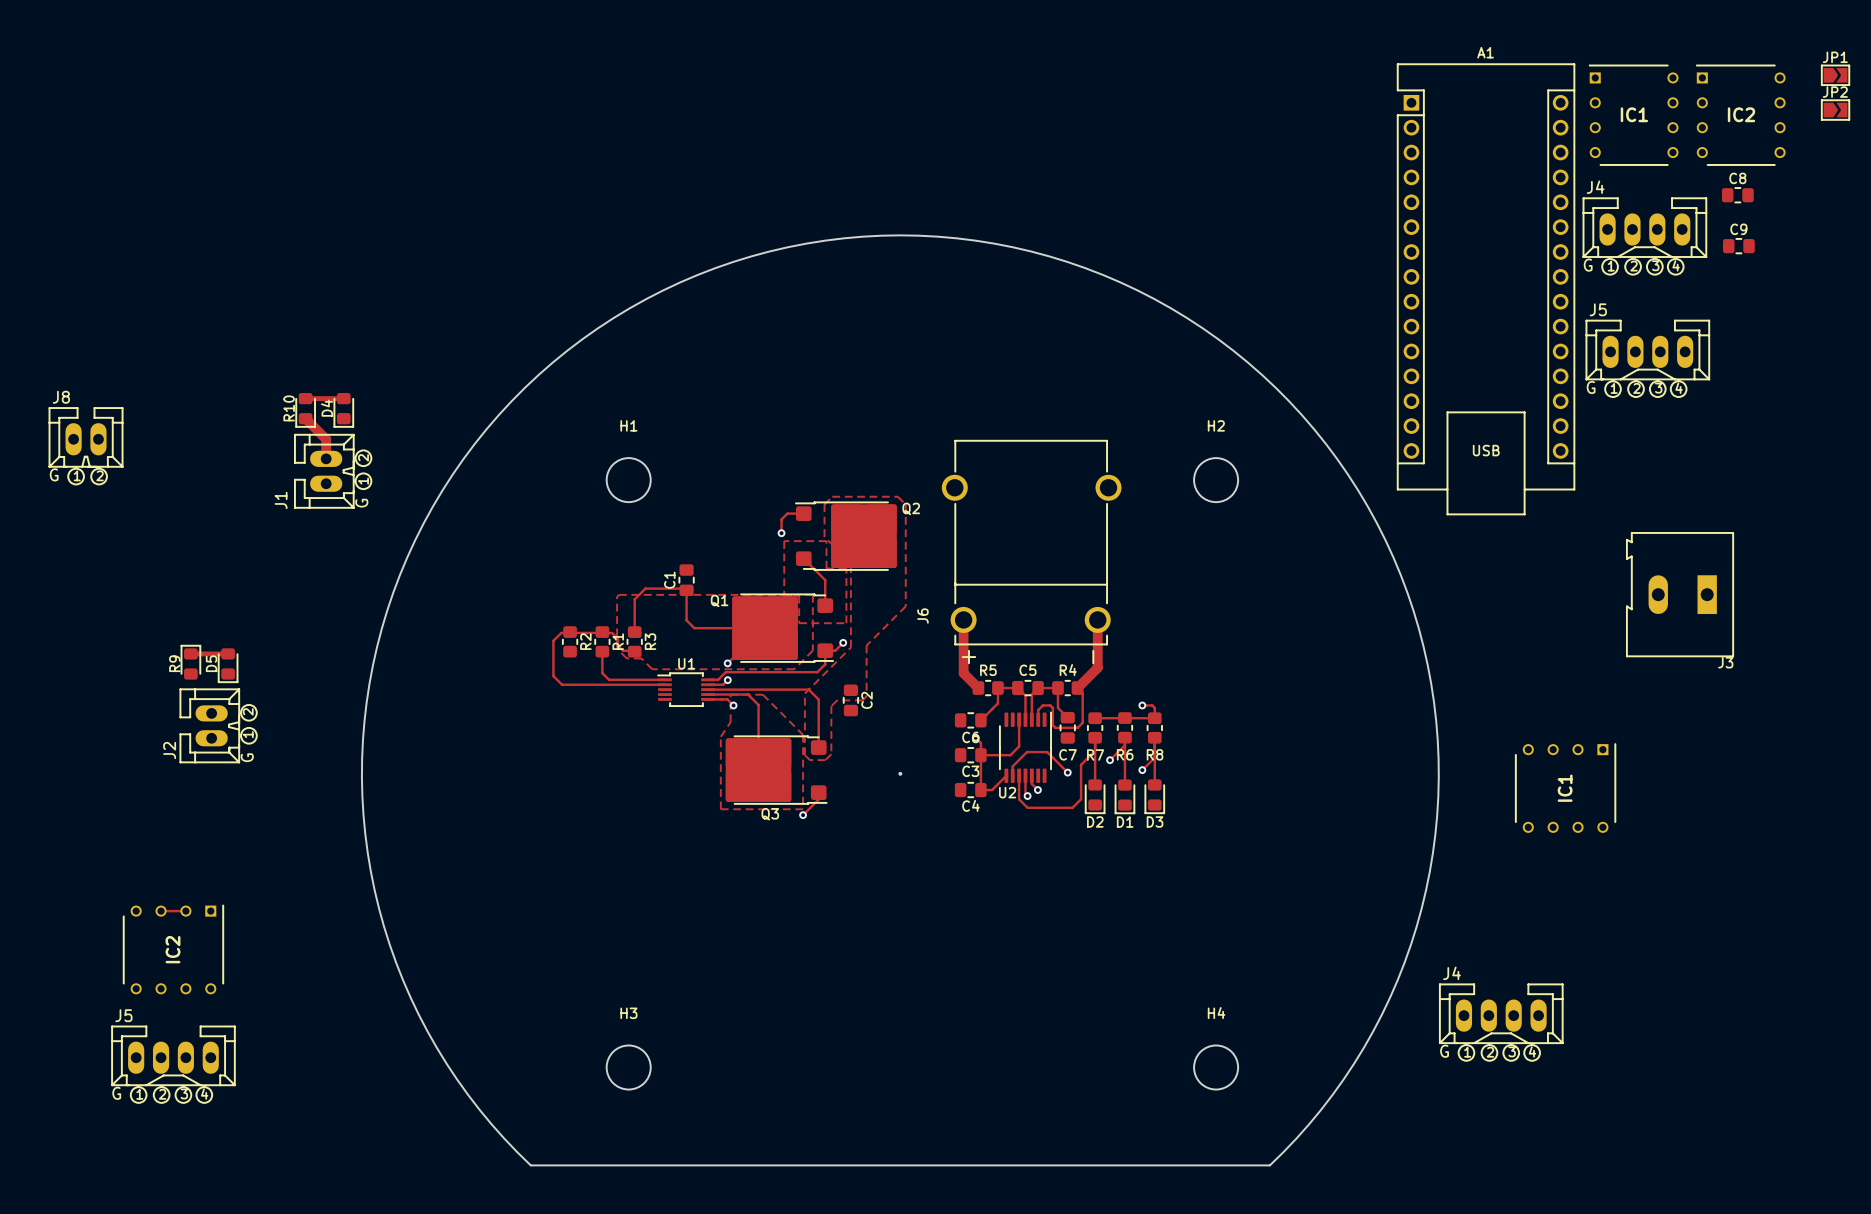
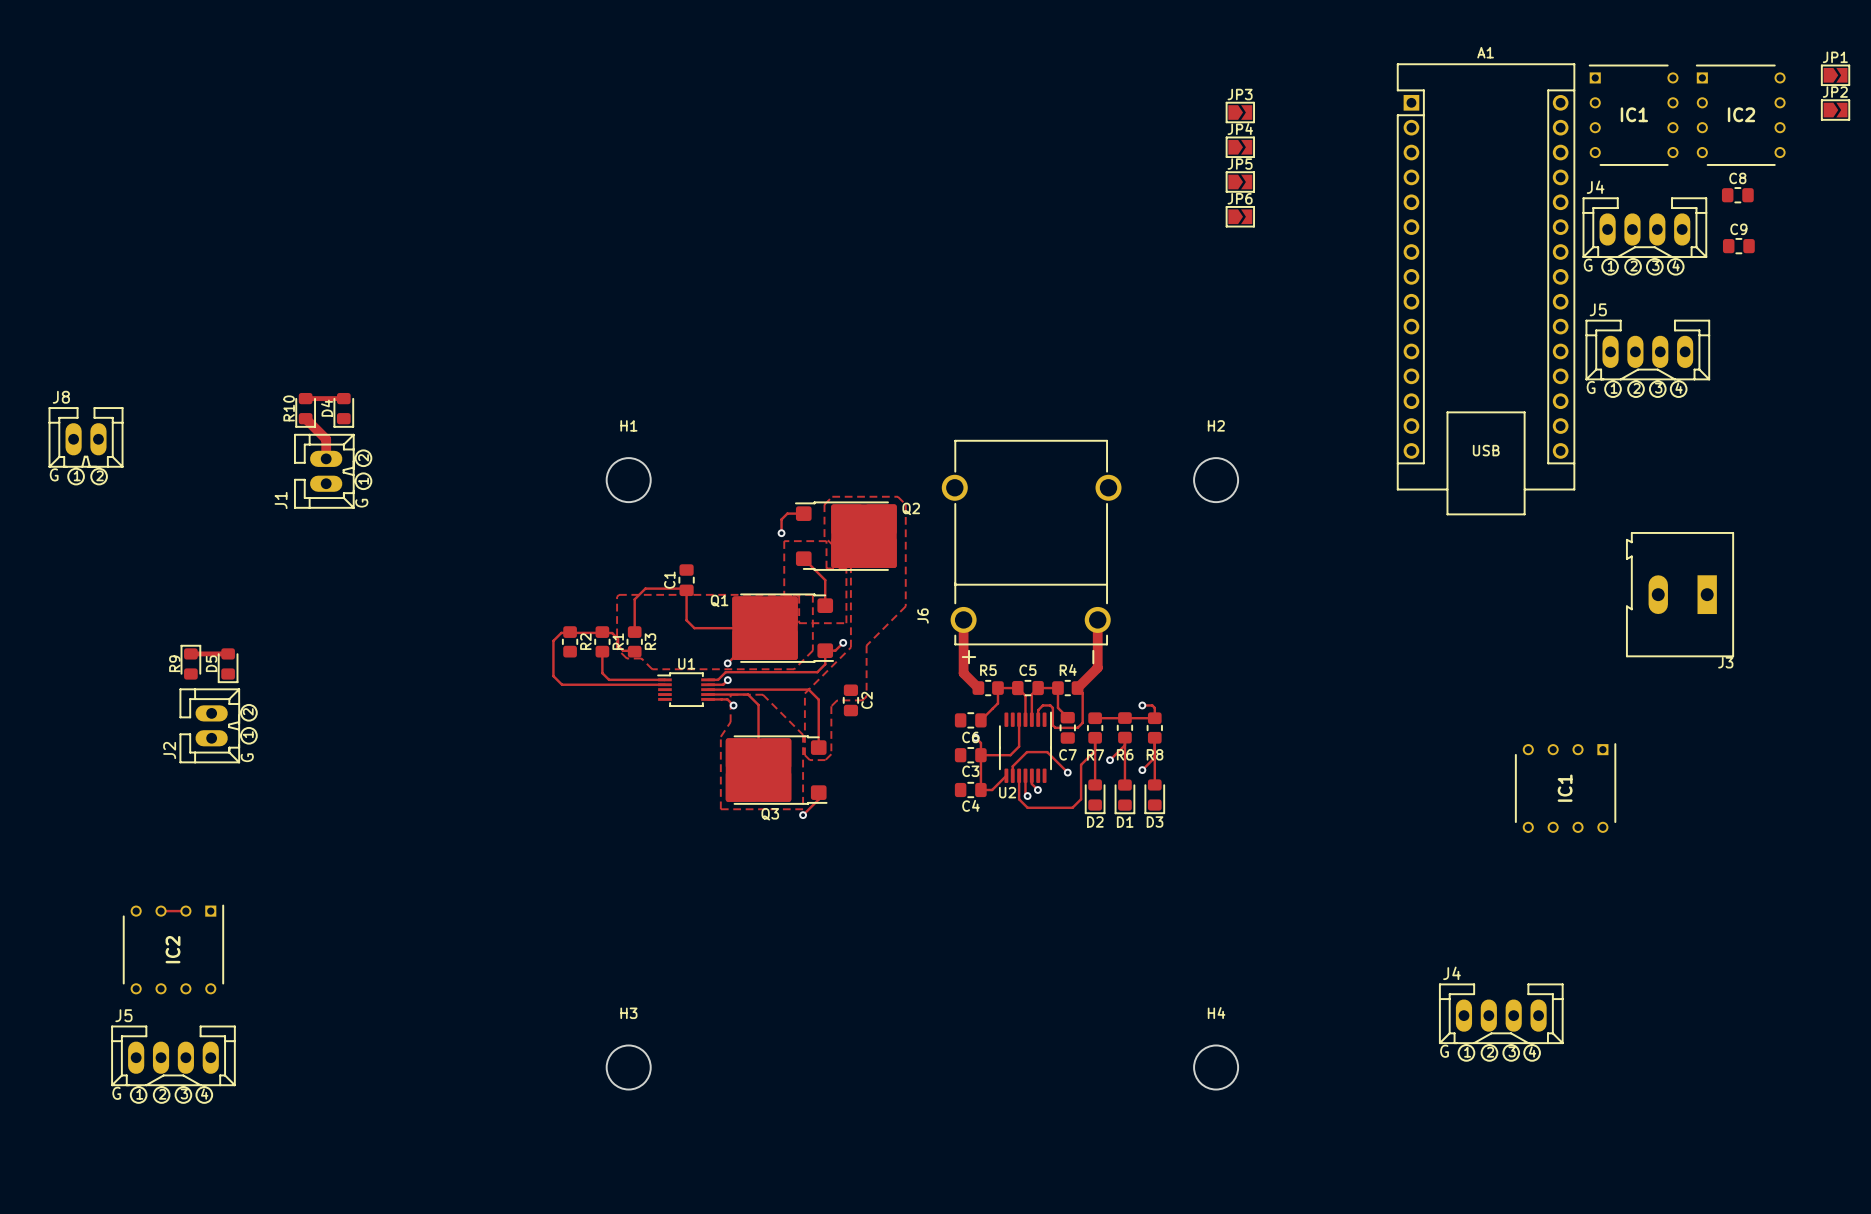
JP3: none -> (1240, 112)
JP4: none -> (1240, 147)
JP5: none -> (1240, 182)
JP6: none -> (1240, 216)
round board edge: [899, 772, 902, 775] -> none
board edge: (530, 1165) (1269, 1165) (1283, 1152) (1309, 1124) (1343, 1079) (1373, 1031) (1397, 980) (1416, 926) (1429, 871) (1437, 815) (1438, 777) (1437, 740) (1431, 683) (1418, 628) (1400, 574) (1377, 523) (1348, 474) (1314, 429) (1275, 387) (1233, 350) (1202, 328) (1154, 298) (1102, 274) (1067, 261) (1012, 247) (956, 238) (900, 235) (843, 238) (787, 247) (733, 261) (697, 274) (646, 298) (597, 328) (552, 362) (511, 401) (486, 429) (452, 474) (423, 523) (399, 574) (381, 628) (369, 683) (362, 740) (361, 777) (365, 834) (374, 890) (389, 944) (410, 997) (436, 1047) (468, 1094) (504, 1138) (530, 1165) -> none

